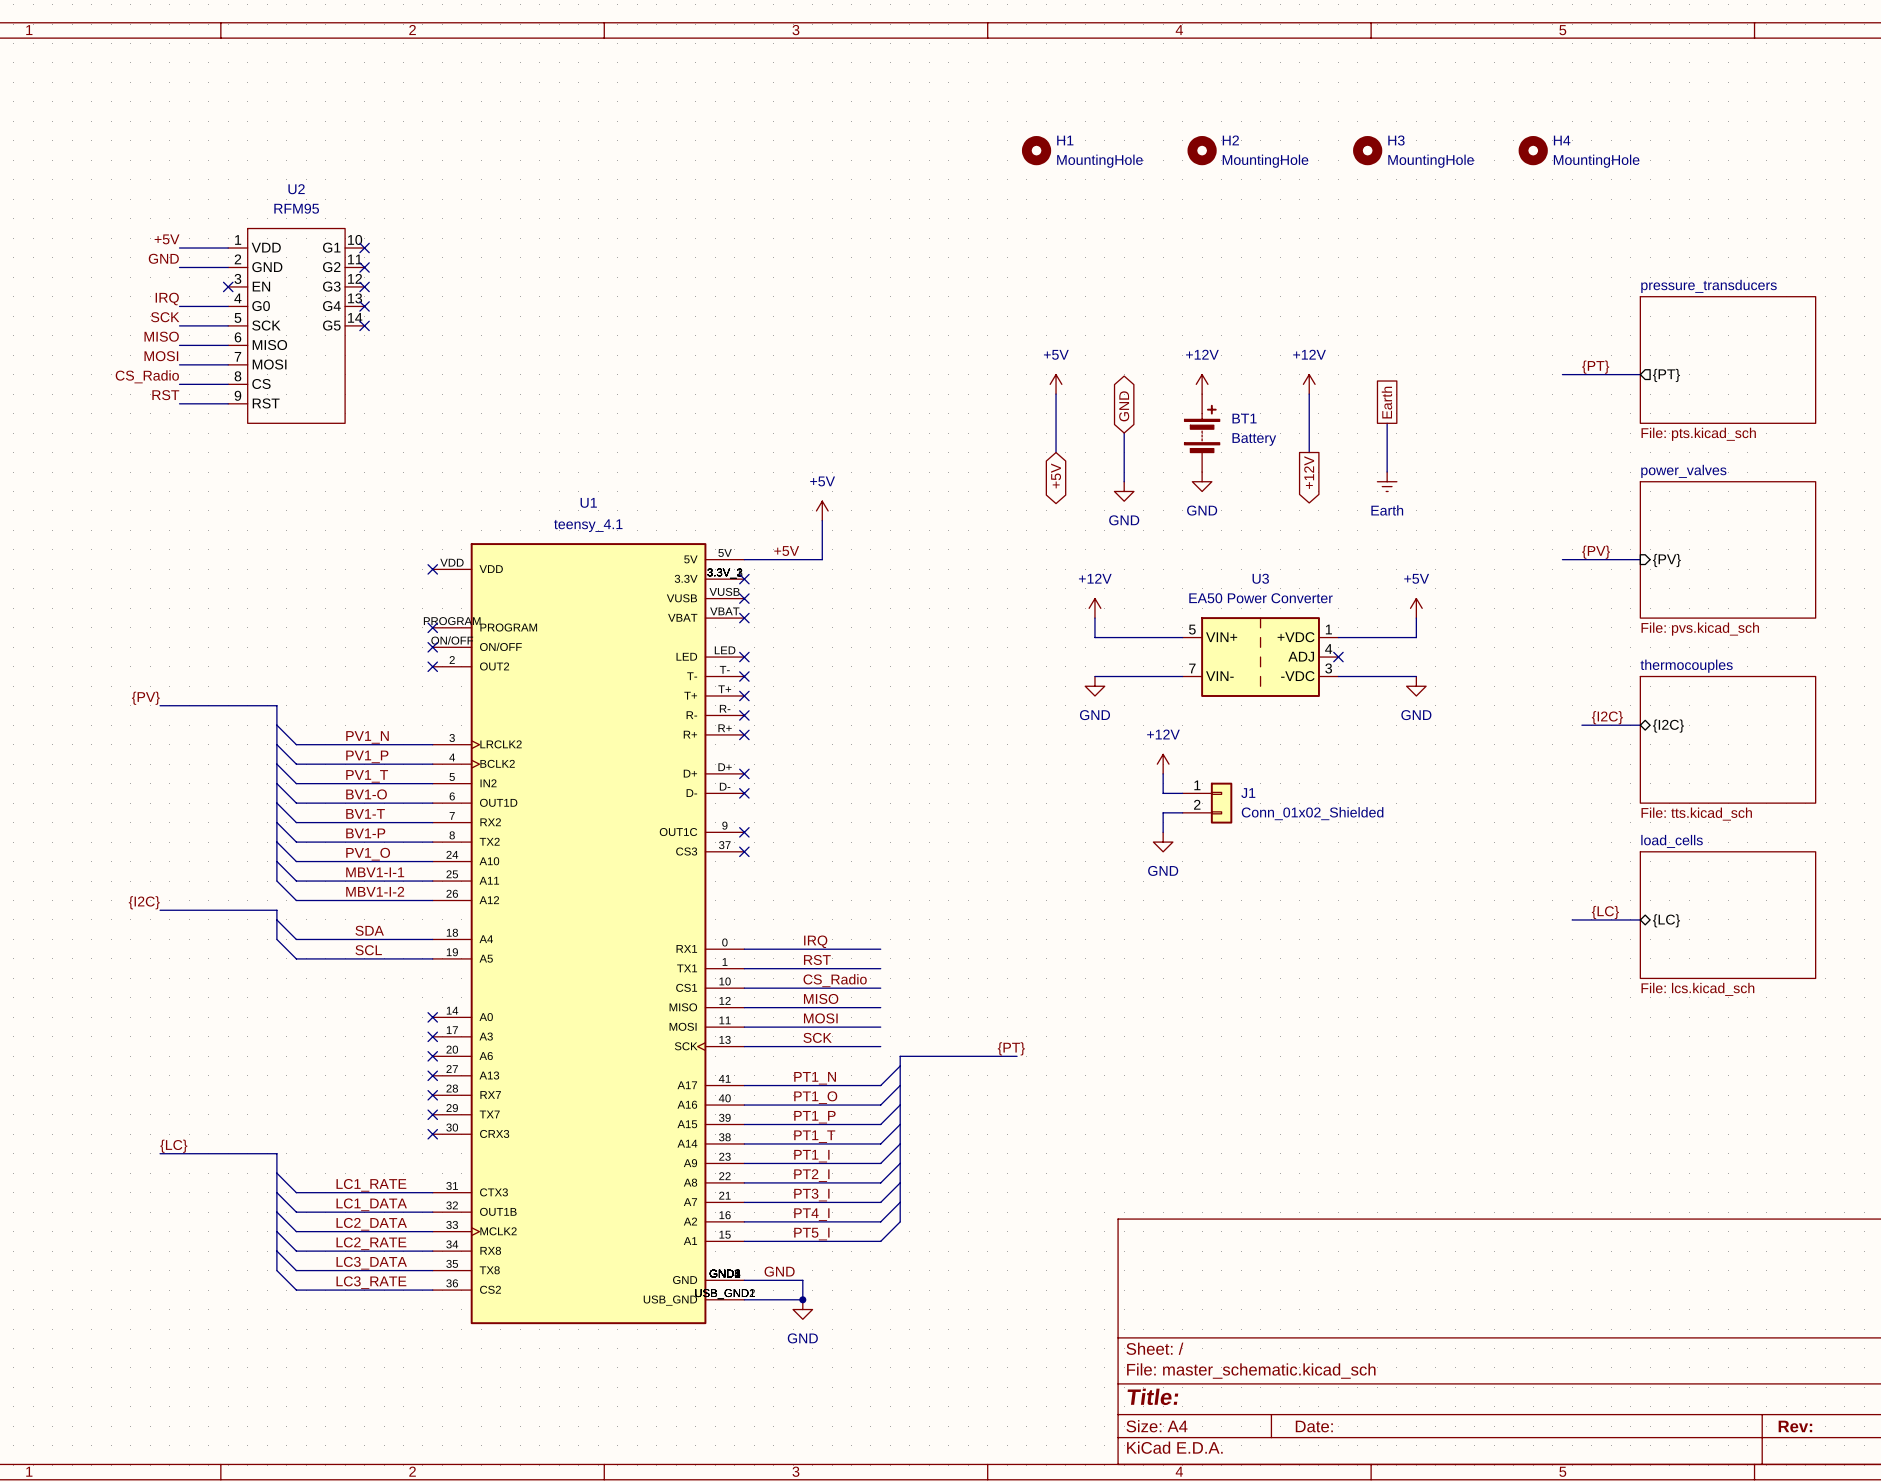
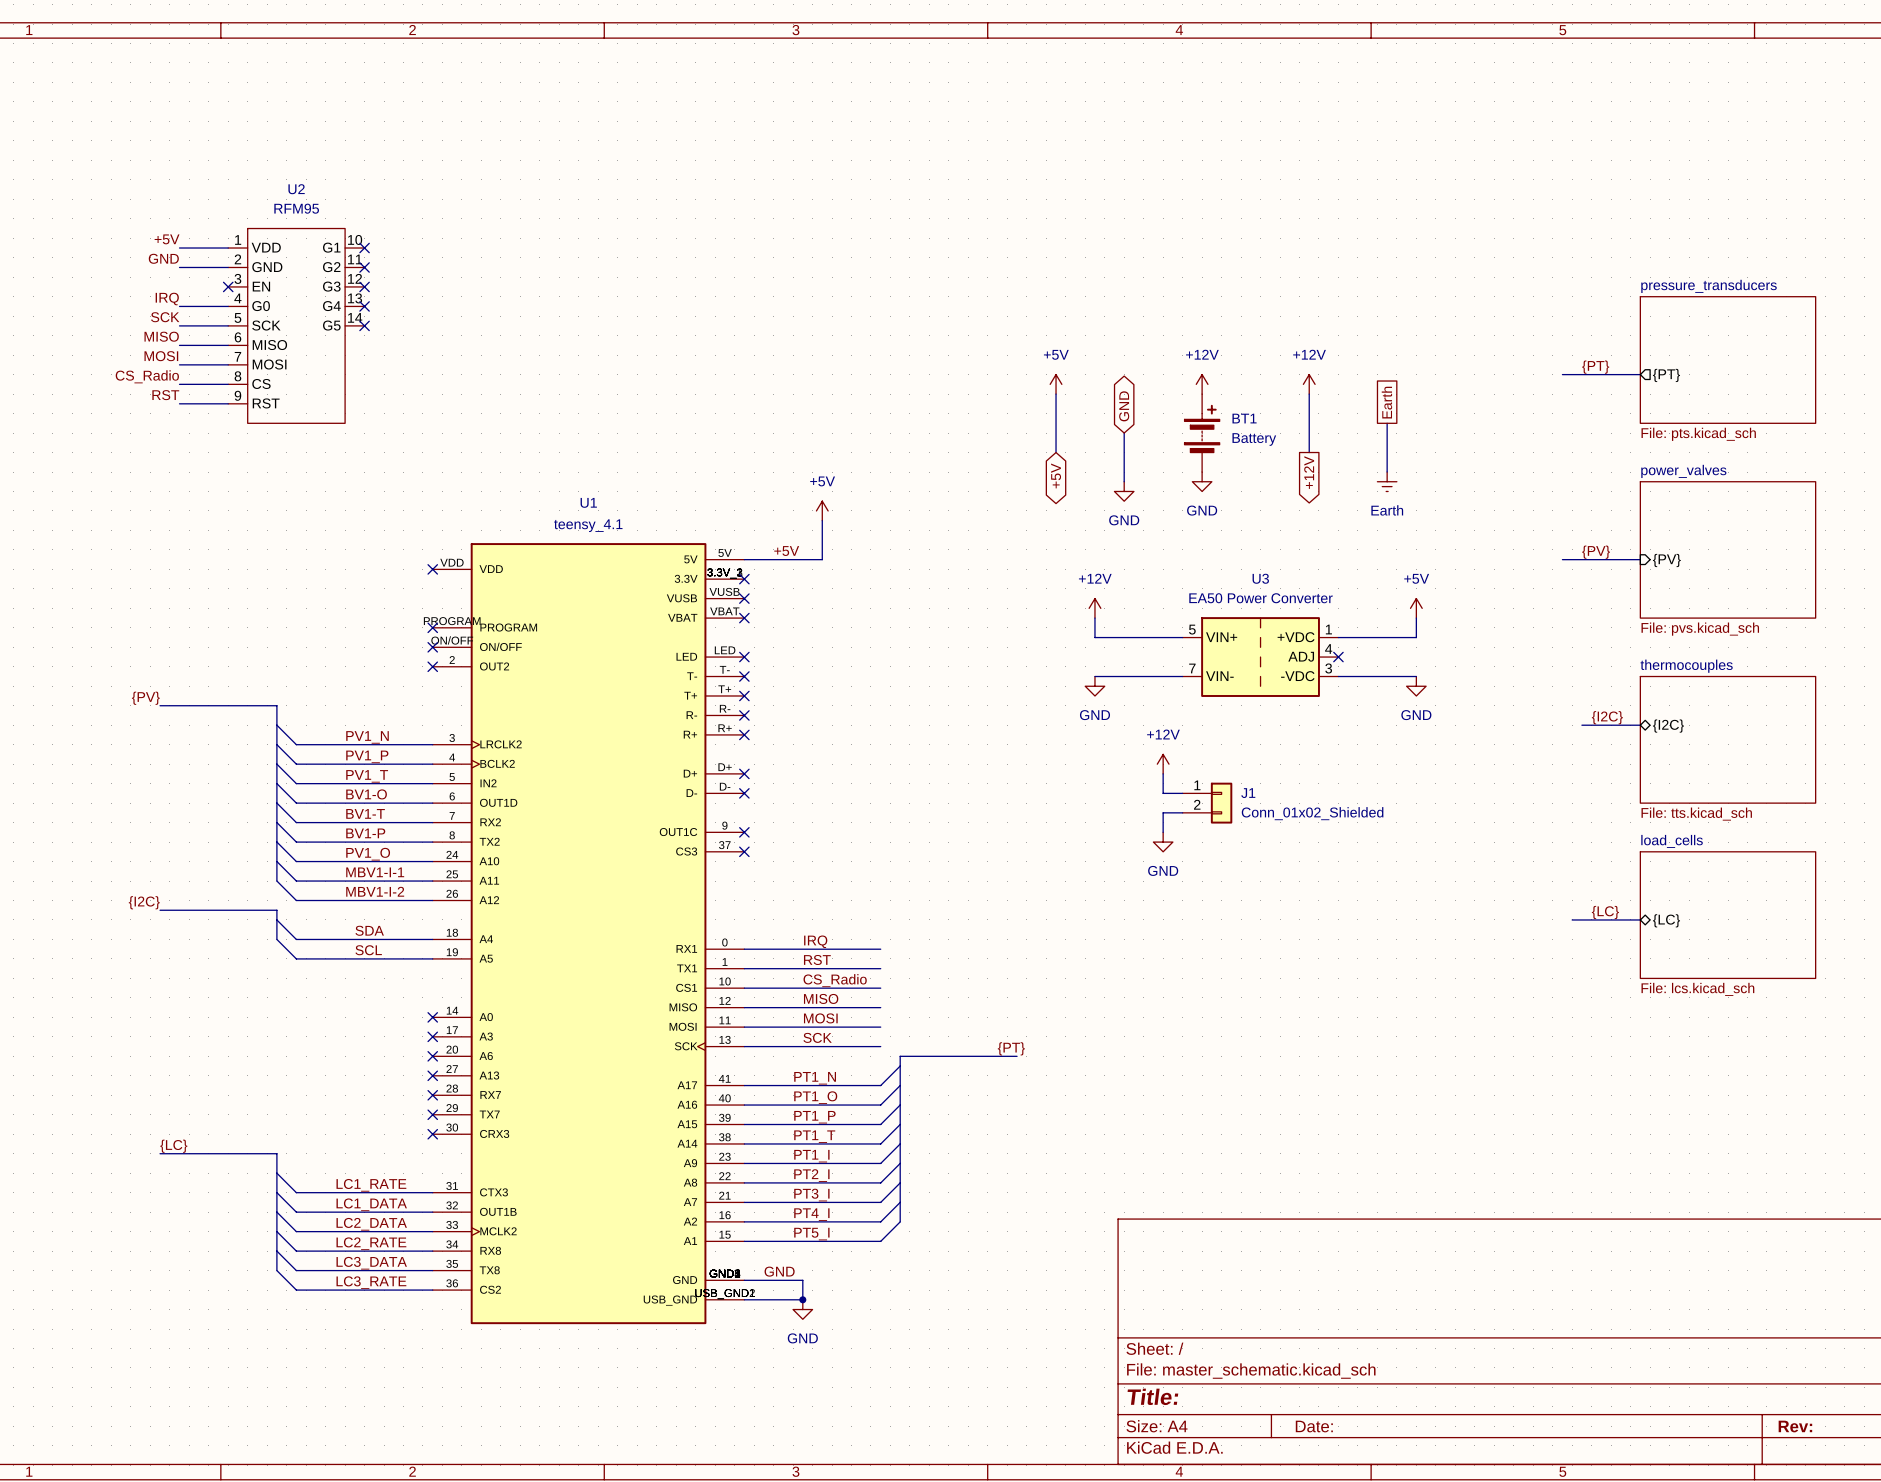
H1: MountingHole (1036, 150) -> none
H2: MountingHole (1202, 150) -> none
H3: MountingHole (1367, 150) -> none
H4: MountingHole (1533, 150) -> none

